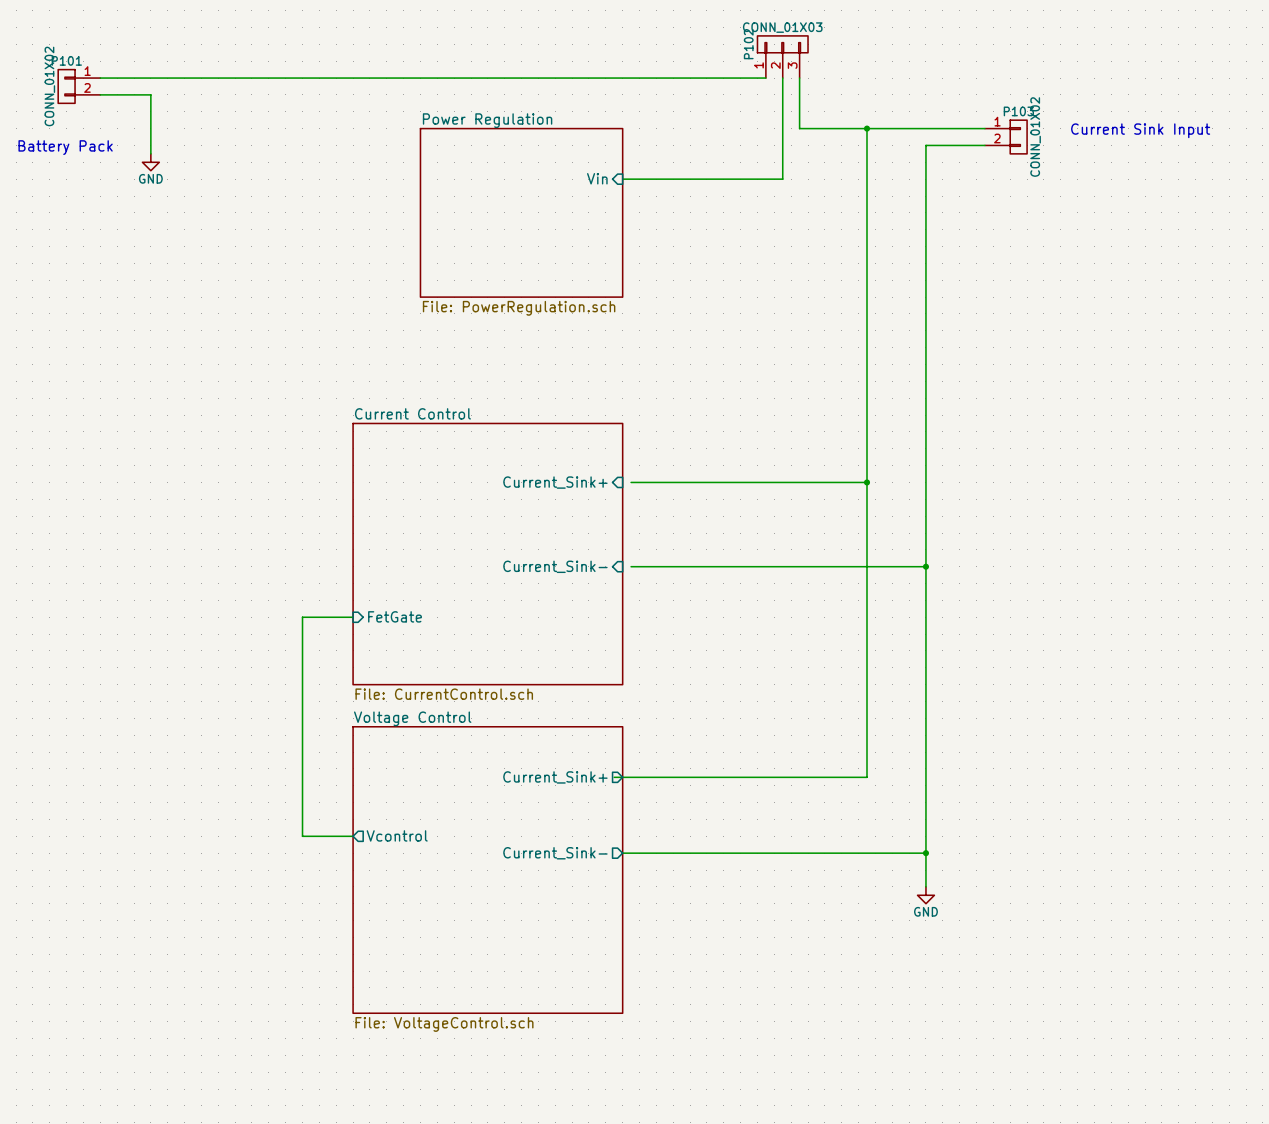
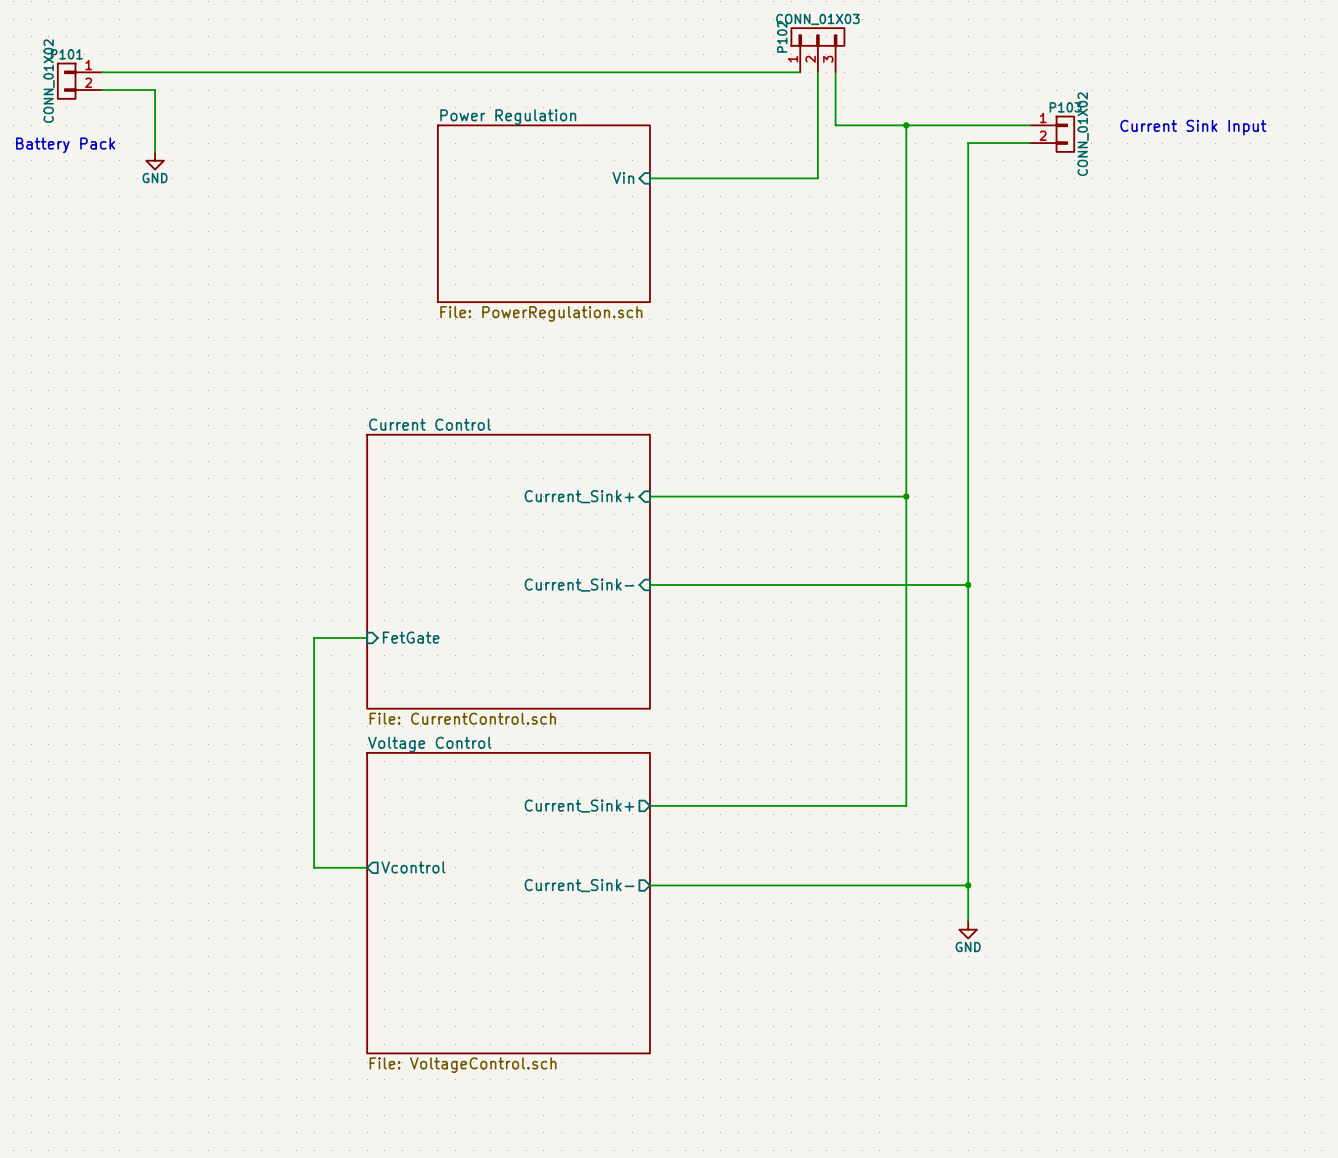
wire: none -> (649, 496) (658, 496)
wire: none -> (649, 584) (658, 584)
wire: (614, 777) (622, 777) -> none

